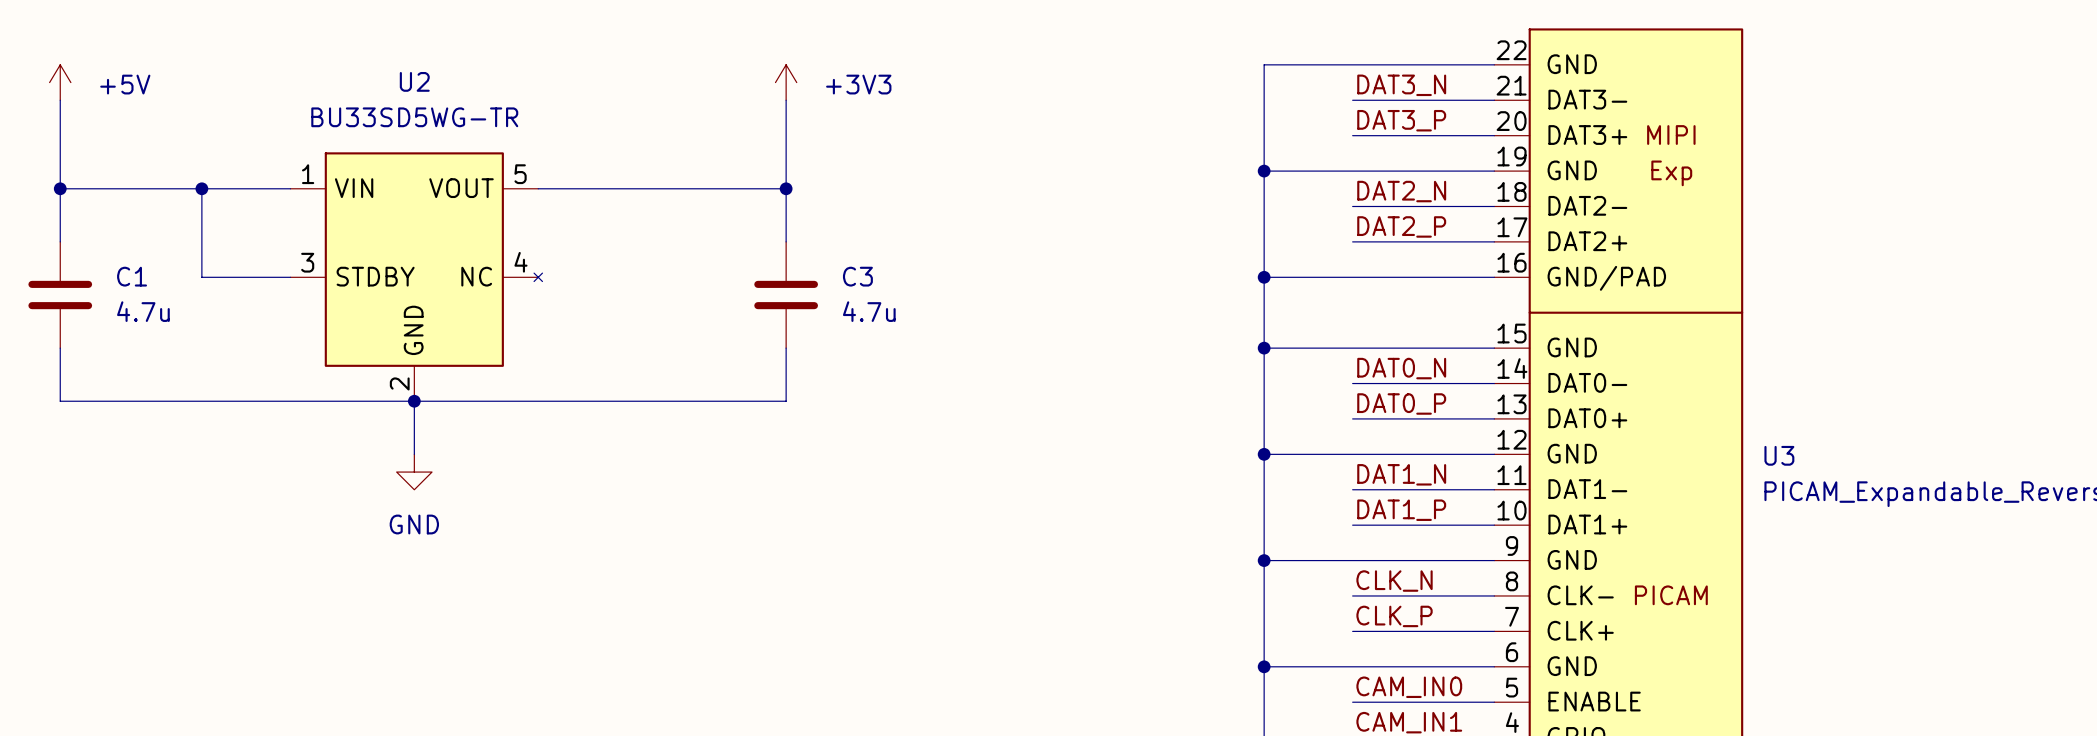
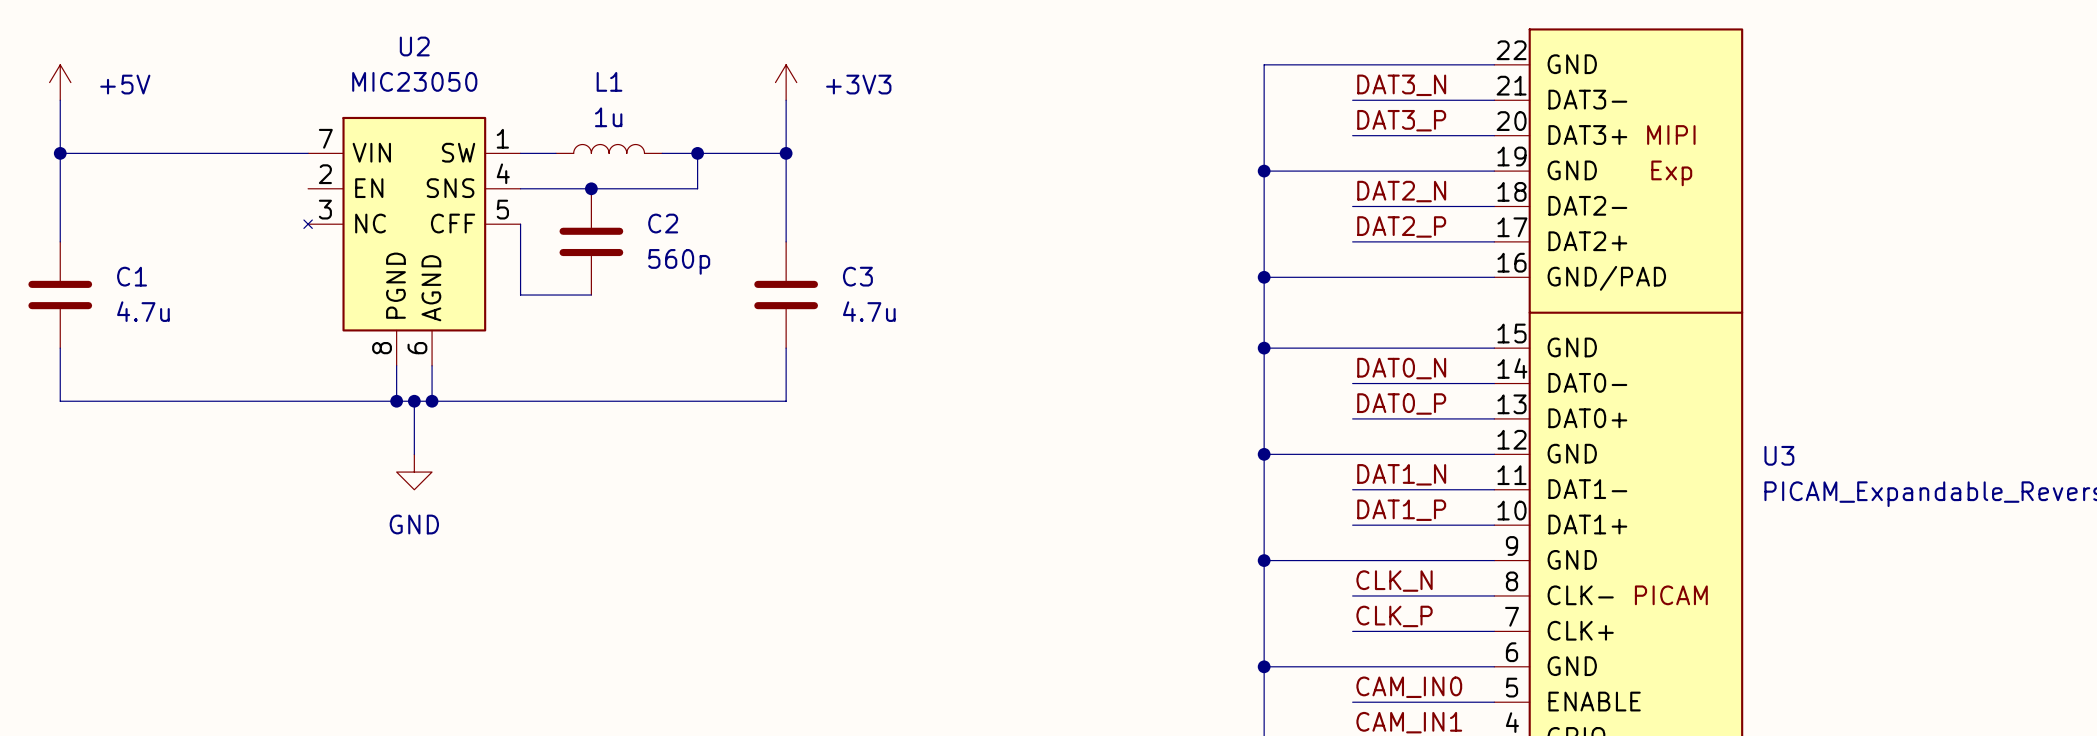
U2 value: BU33SD5WG-TR (414, 117) -> MIC23050 (414, 81)
L1: none -> 1u (609, 148)
U2 symbol: [290, 152, 543, 402] -> [303, 116, 521, 366]
wire: none -> (60, 153) (308, 153)
wire: none -> (520, 153) (555, 153)
wire: none -> (662, 153) (786, 153)
junction: none -> (697, 153)
wire: (60, 188) (290, 188) -> none
junction position: (60, 188) -> (60, 153)
wire: (201, 188) (201, 277) (290, 277) -> none
junction: (201, 188) -> none
junction: none -> (591, 188)
wire: (697, 188) (786, 188) -> (697, 188) (697, 153)
junction position: (786, 188) -> (786, 153)
wire: none -> (520, 224) (520, 295) (591, 295)
C2: none -> 560p (591, 241)
wire: none -> (396, 365) (396, 401)
wire: none -> (432, 365) (432, 401)
junction: none -> (396, 401)
junction: none -> (432, 401)

